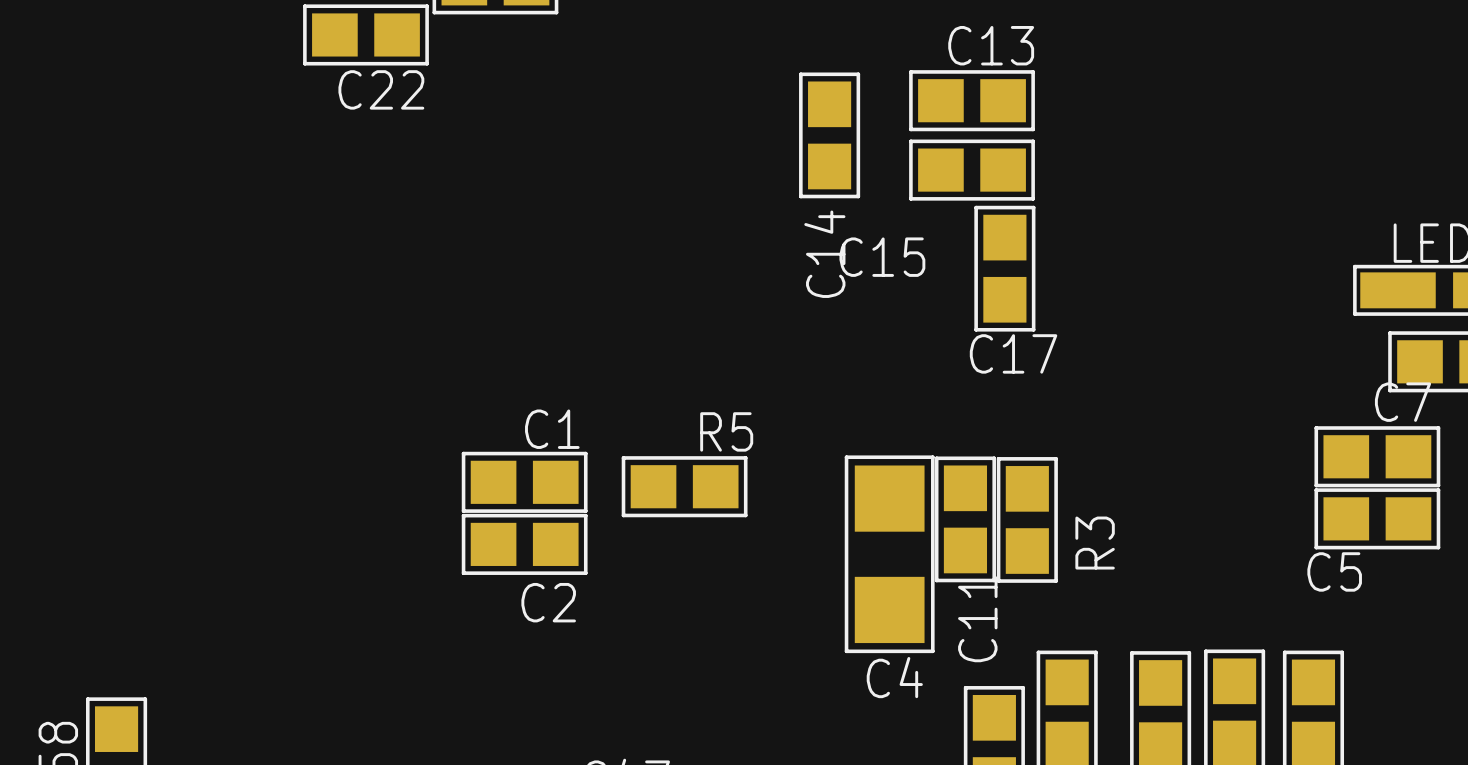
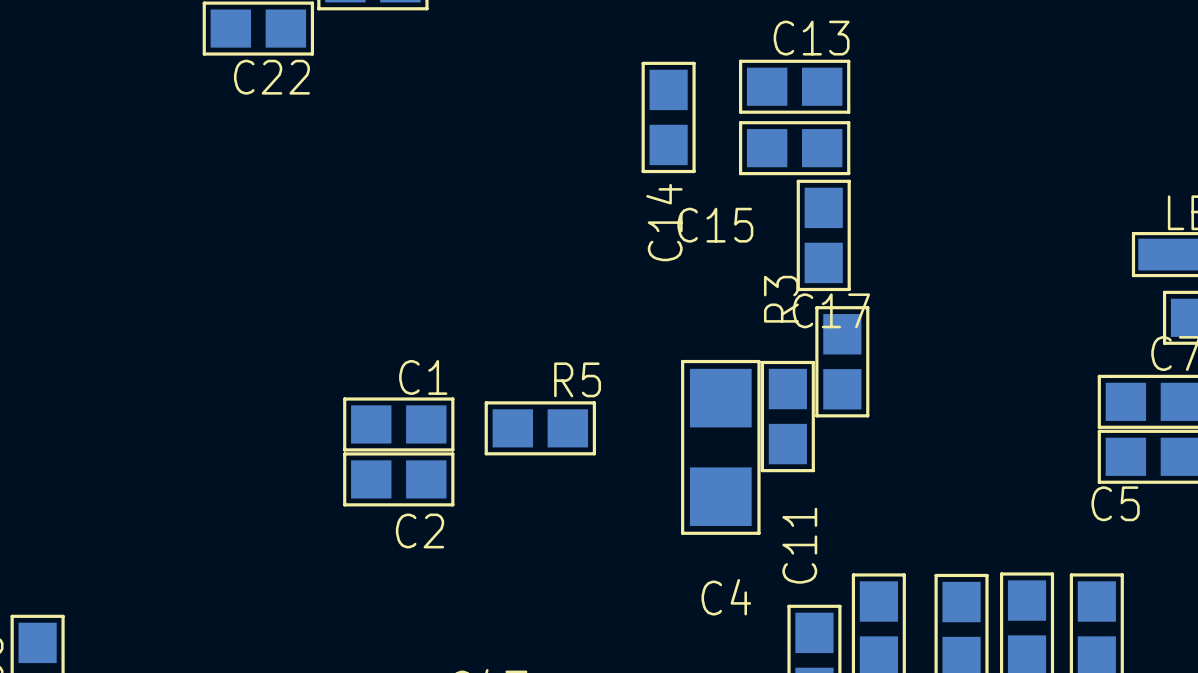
C11 position: (965, 519) -> (787, 416)
R3 position: (1027, 519) -> (842, 361)
R3 name position: R3 (1095, 543) -> R3 (781, 299)
C4 position: (889, 554) -> (720, 447)

